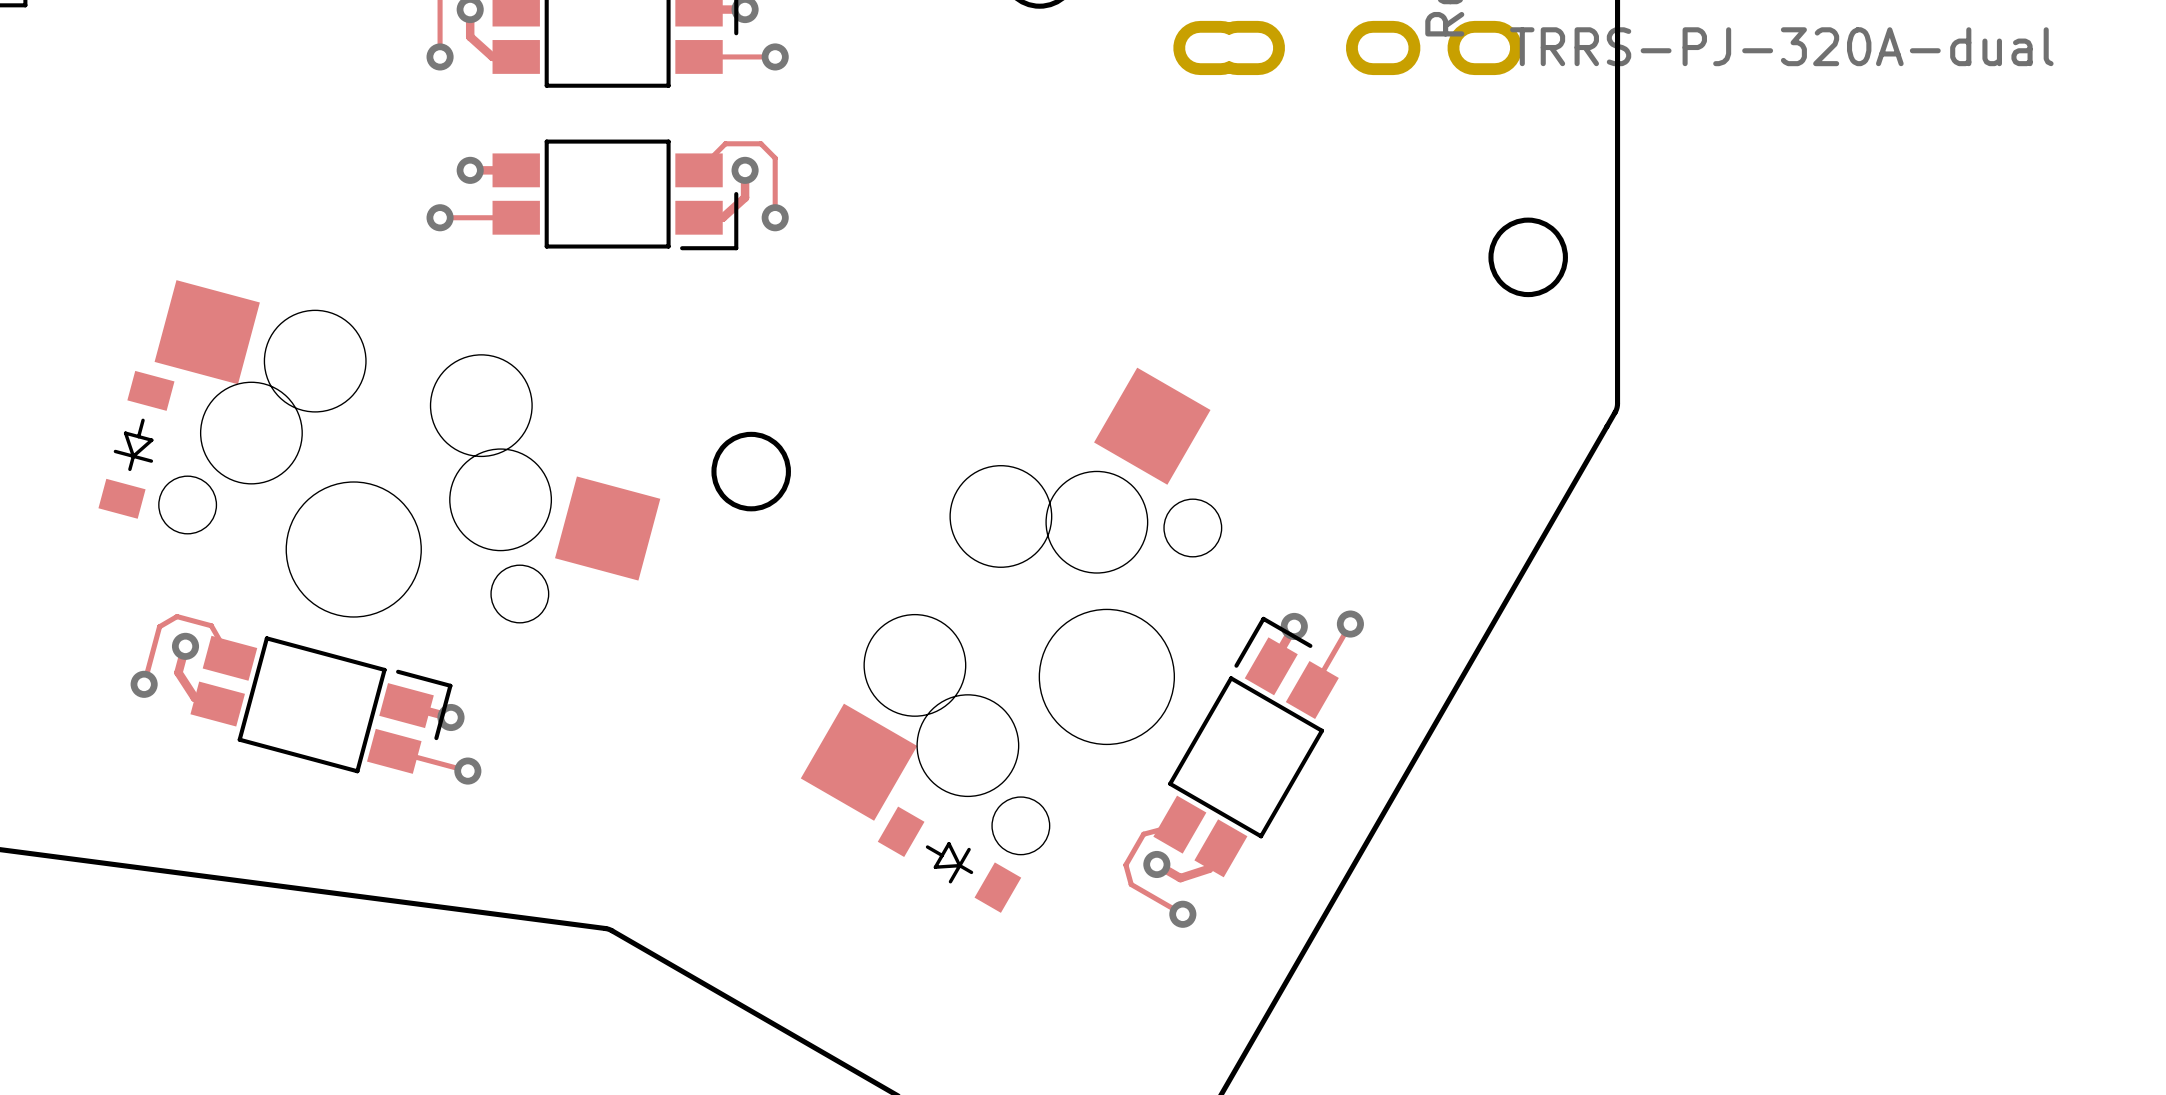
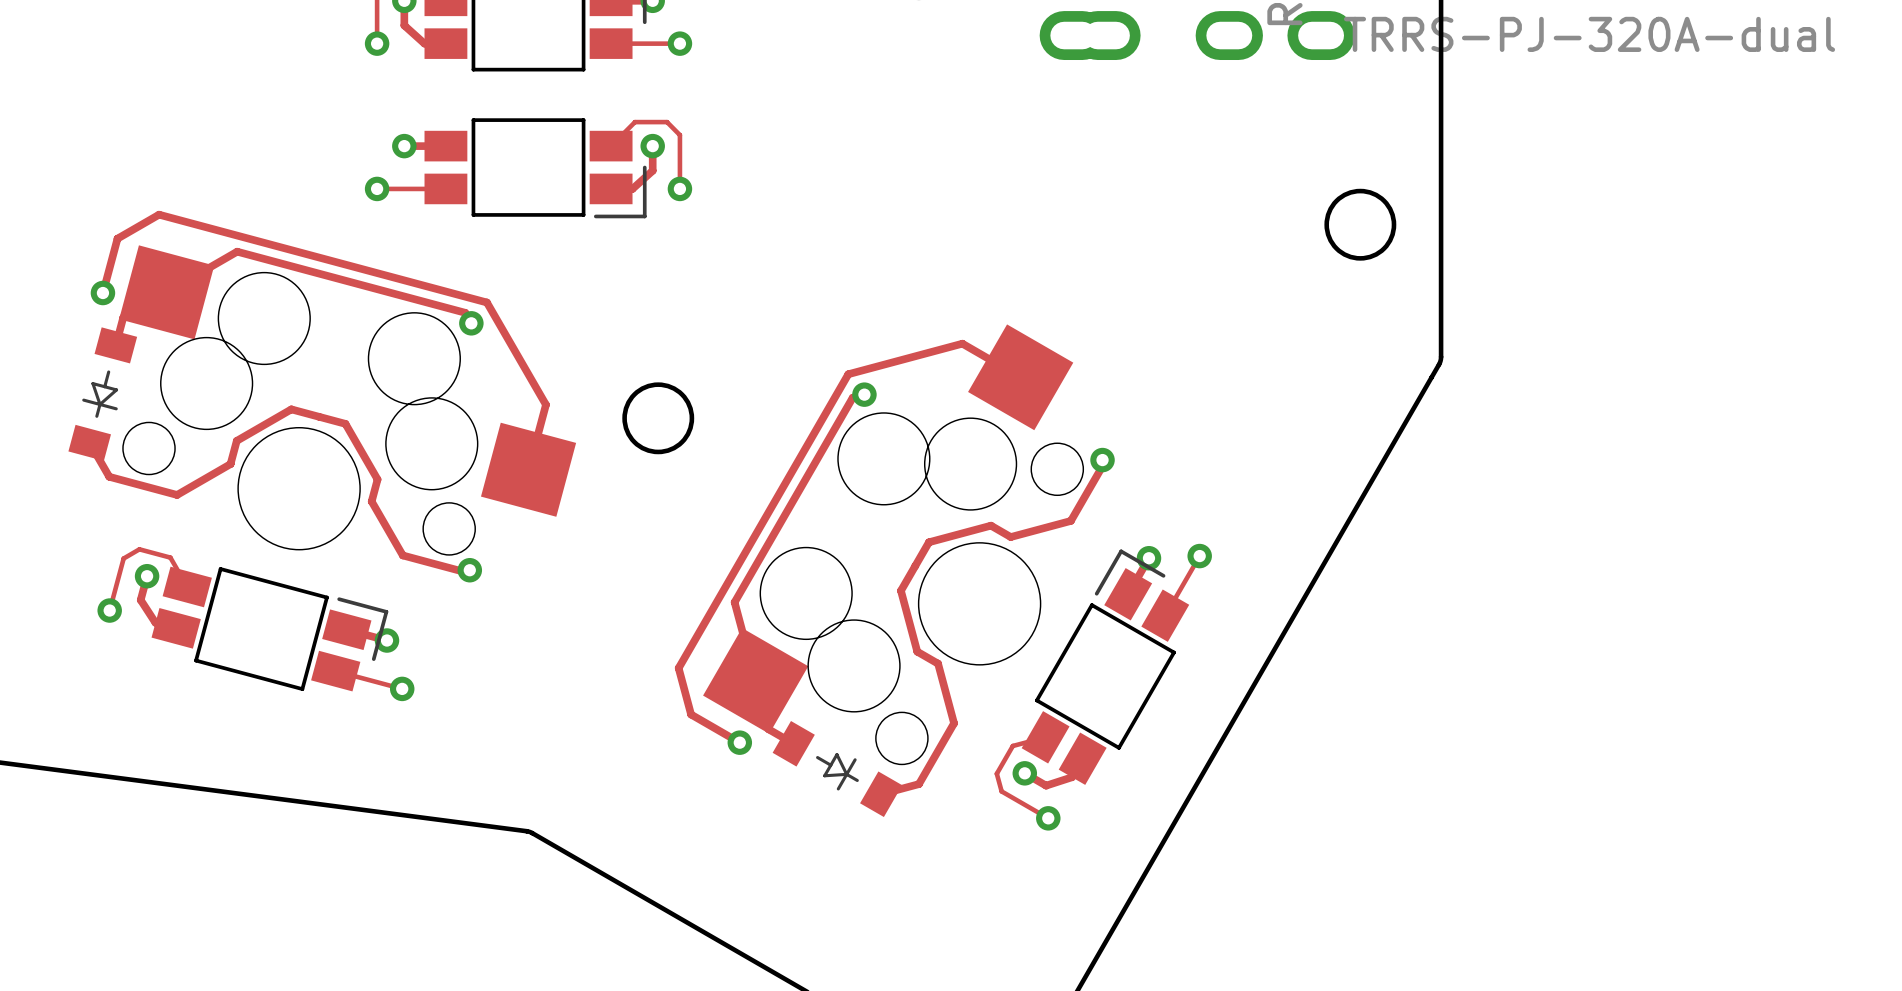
track: none -> (102, 293) (117, 238) (159, 214) (486, 302) (545, 404) (528, 469)
via: none -> (102, 293)
track: none -> (471, 323) (465, 312) (237, 251) (123, 317) (115, 345)
via: none -> (471, 323)
track: none -> (1020, 377) (962, 343) (848, 374) (678, 668) (691, 714) (739, 742)
track: none -> (864, 394) (852, 397) (734, 602) (768, 729) (793, 743)
via: none -> (864, 394)
track: none -> (89, 442) (109, 476) (177, 494) (230, 464)
track: none -> (1102, 460) (1103, 464) (1070, 520) (1010, 537) (990, 525) (928, 542) (900, 590) (917, 651) (937, 663)
via: none -> (1102, 460)
track: none -> (230, 463) (236, 440) (291, 409) (345, 423) (377, 479) (371, 501) (402, 555) (466, 572) (469, 570)
via: none -> (469, 570)
track: none -> (938, 663) (954, 723) (918, 784) (881, 794)
via: none -> (739, 742)

